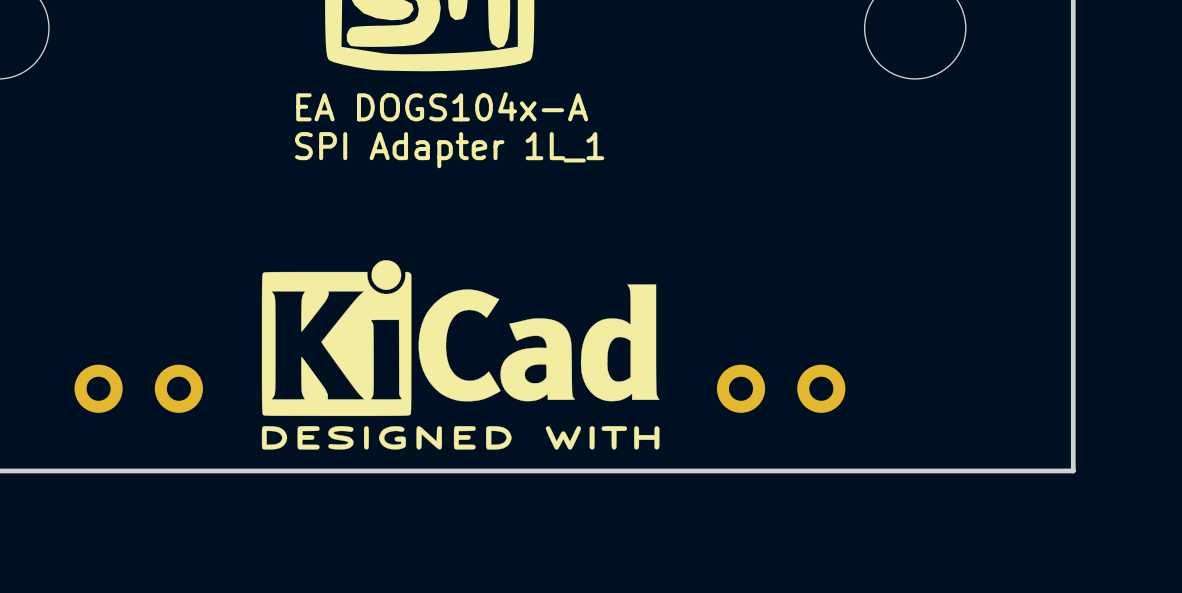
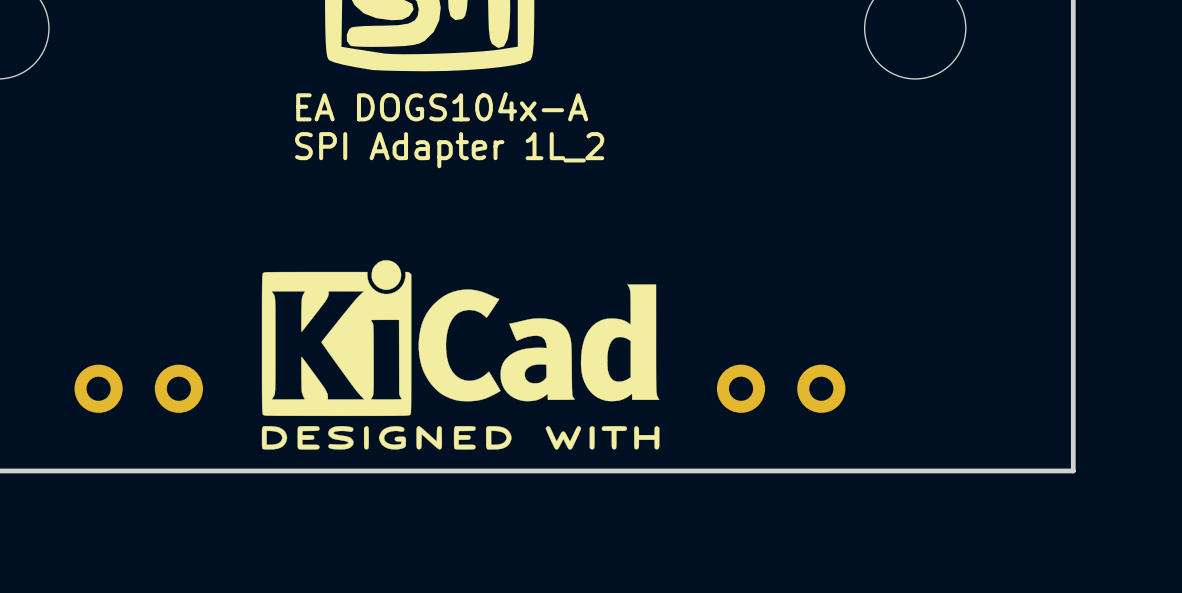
text: SPI Adapter 1L_1 (449, 150) -> SPI Adapter 1L_2 (449, 150)

